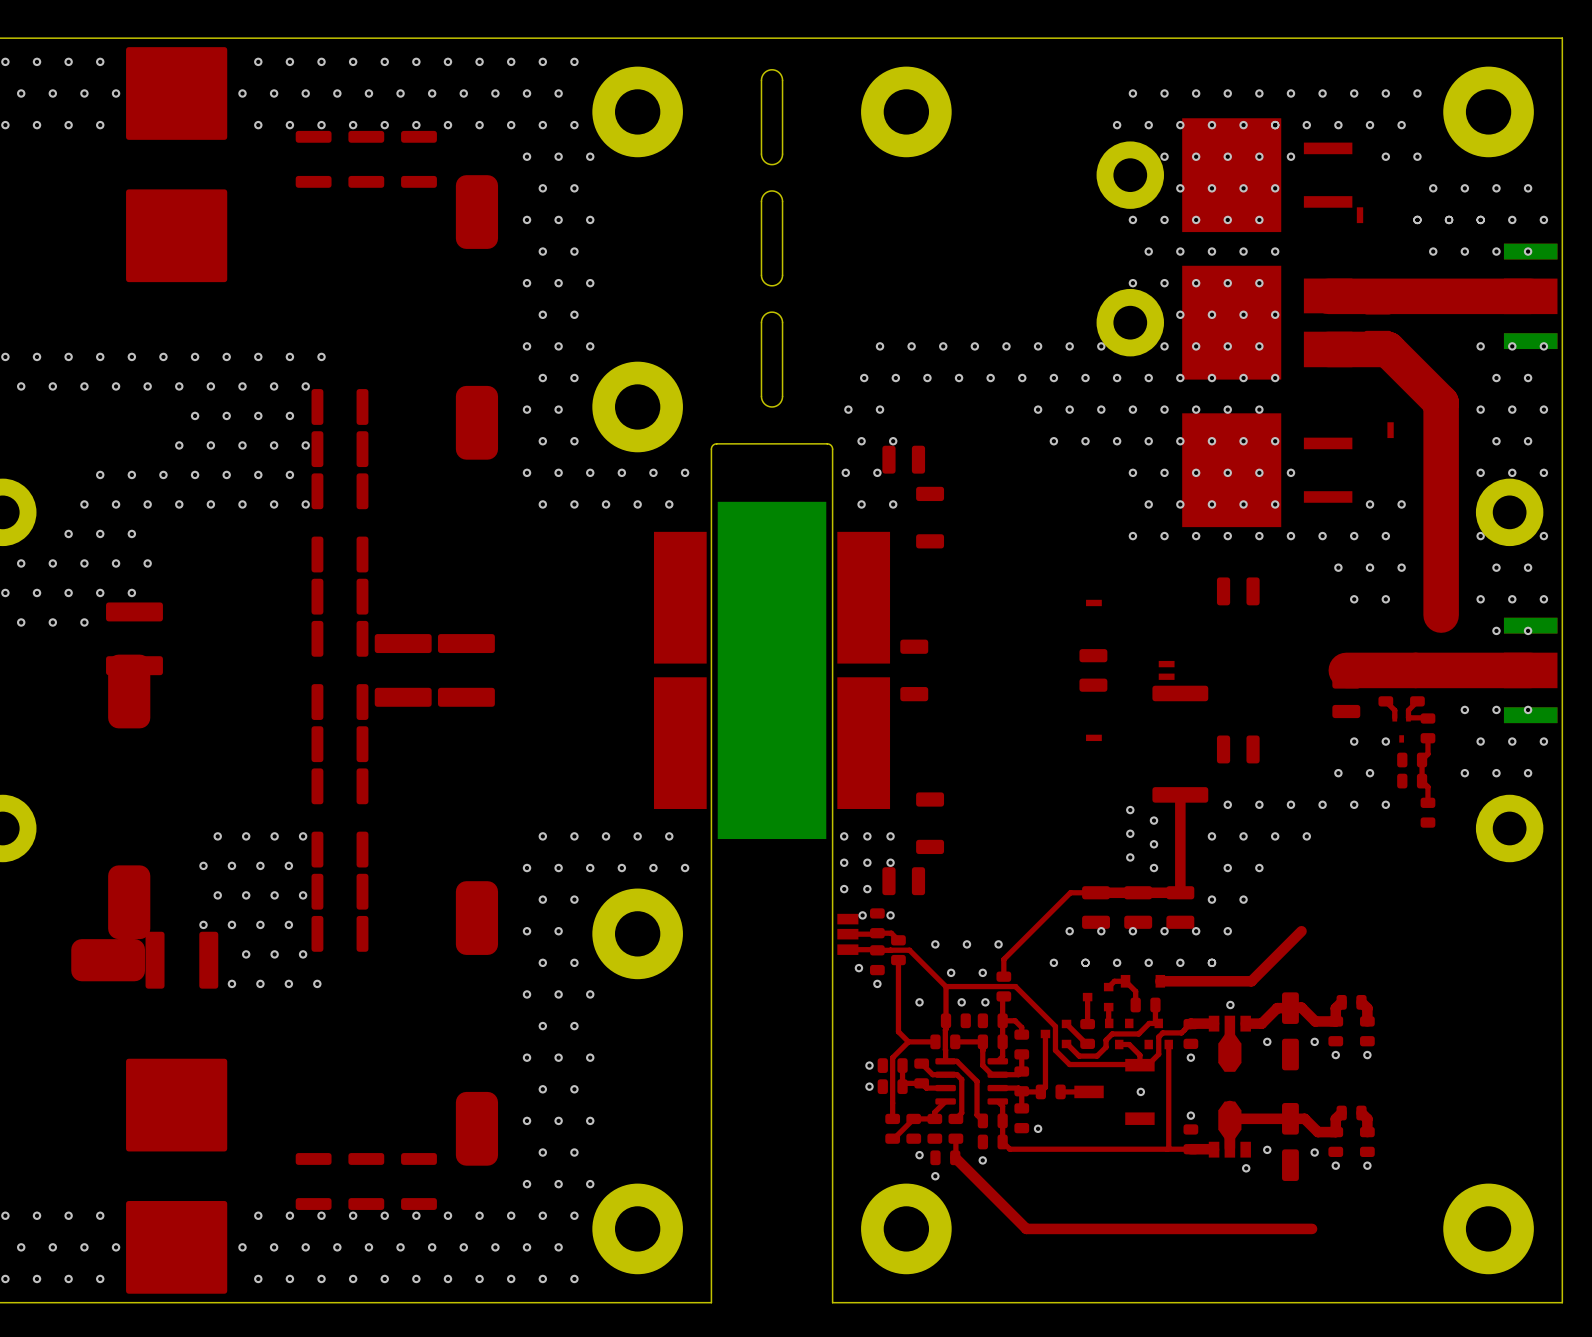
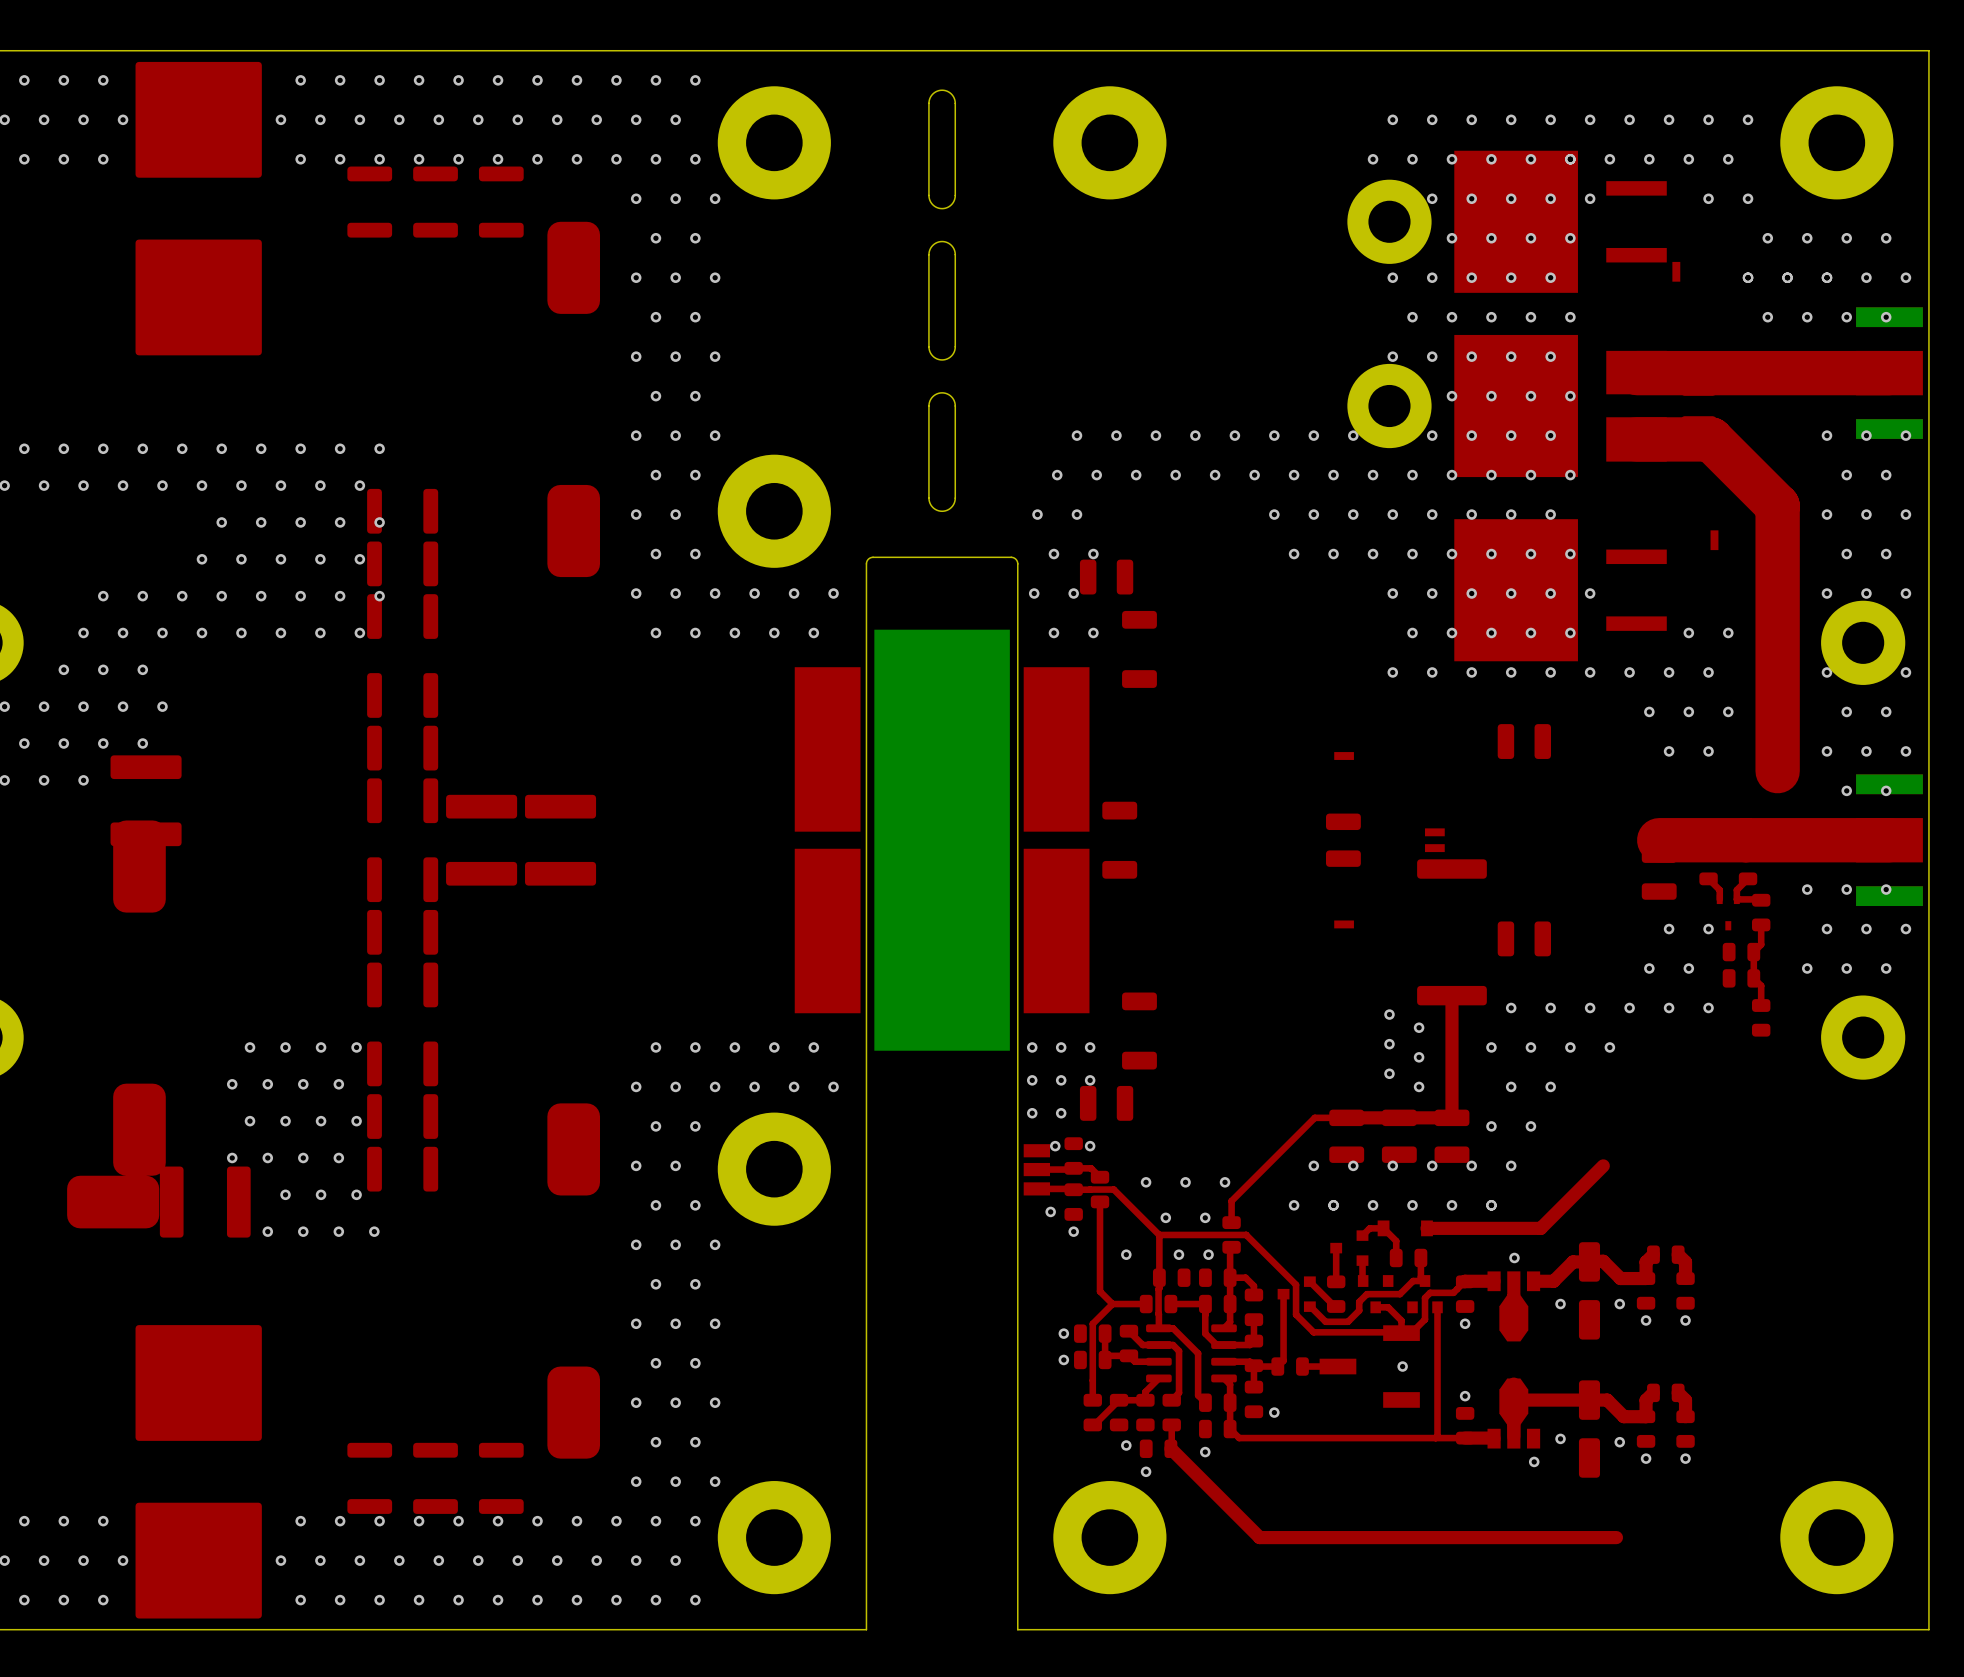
via: none -> (379, 522)
via: none -> (379, 596)

